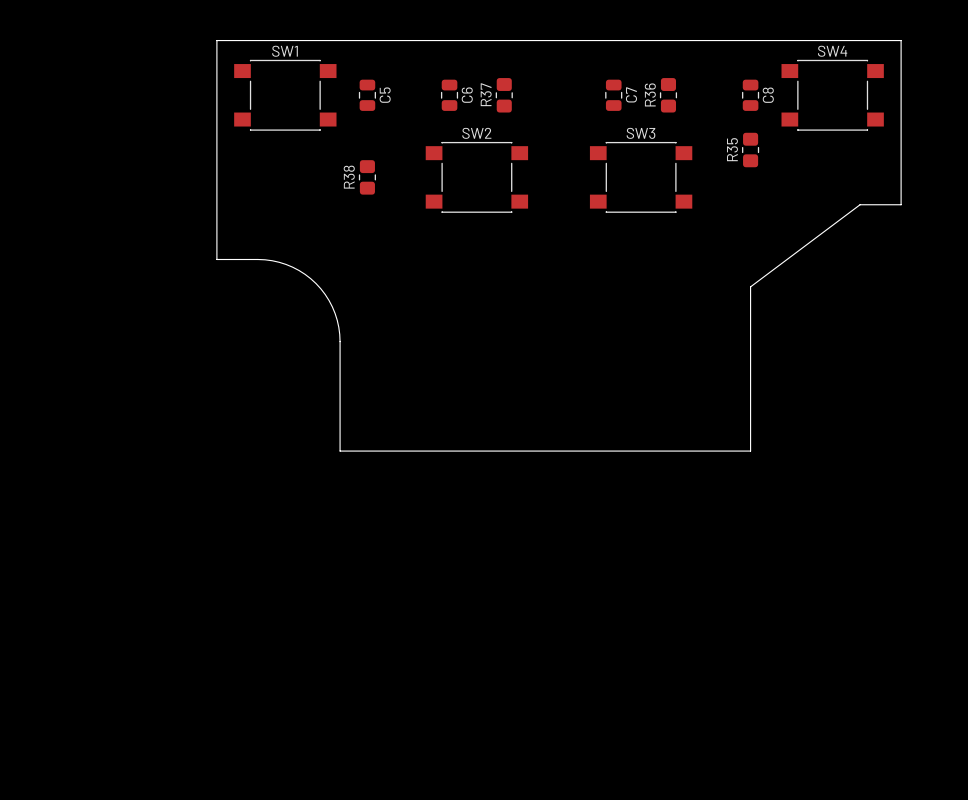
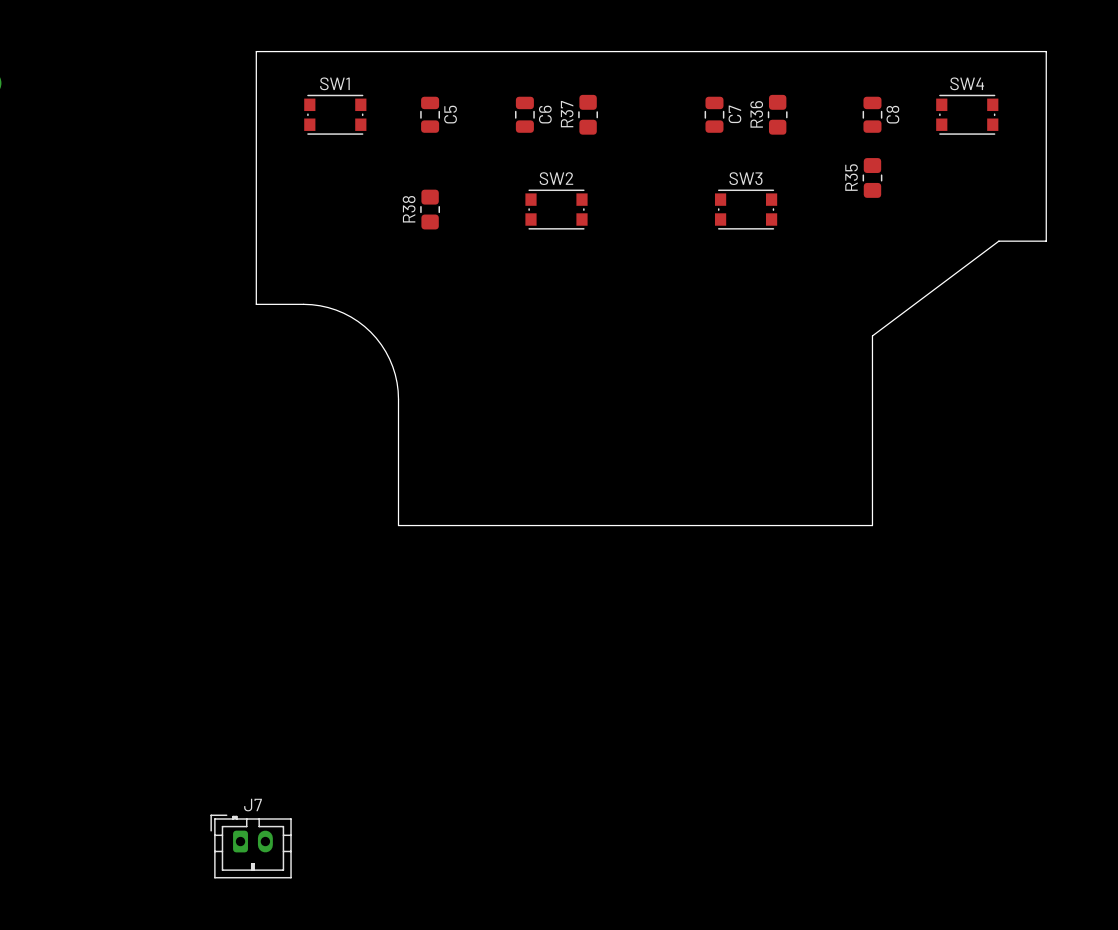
SW1 footprint: [234, 59, 337, 131] -> [304, 94, 367, 135]
SW4 footprint: [781, 59, 884, 131] -> [936, 94, 999, 135]
SW2 footprint: [425, 141, 529, 213] -> [525, 189, 588, 230]
SW3 footprint: [589, 141, 693, 213] -> [714, 189, 778, 230]
J7: none -> (251, 846)

